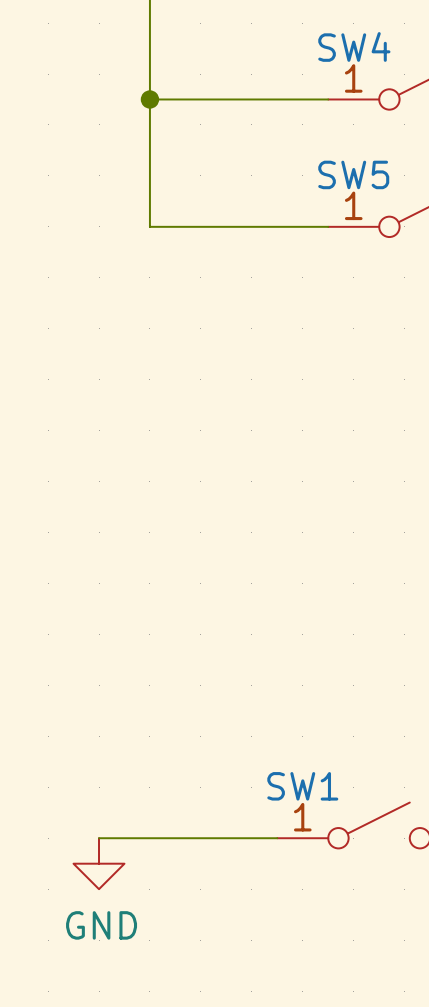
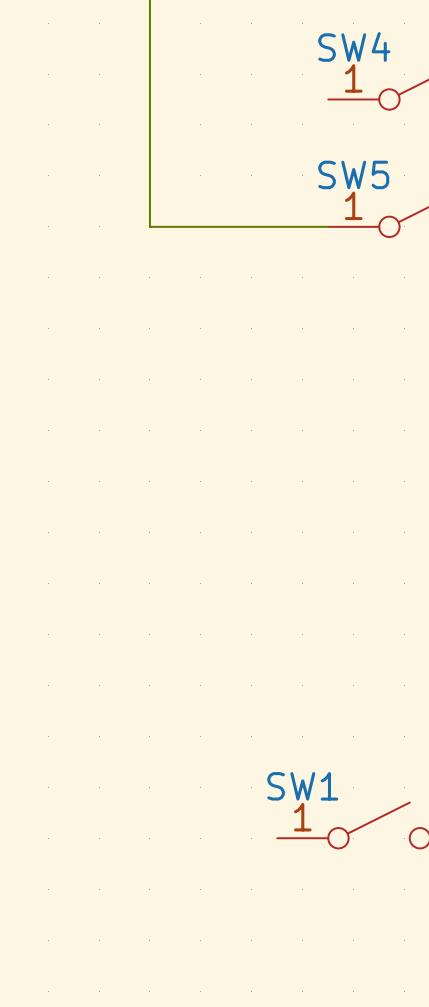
wire: (149, 99) (328, 99) -> none
junction: (149, 99) -> none
wire: (99, 838) (277, 838) -> none
power symbol: GND (99, 863) -> none

